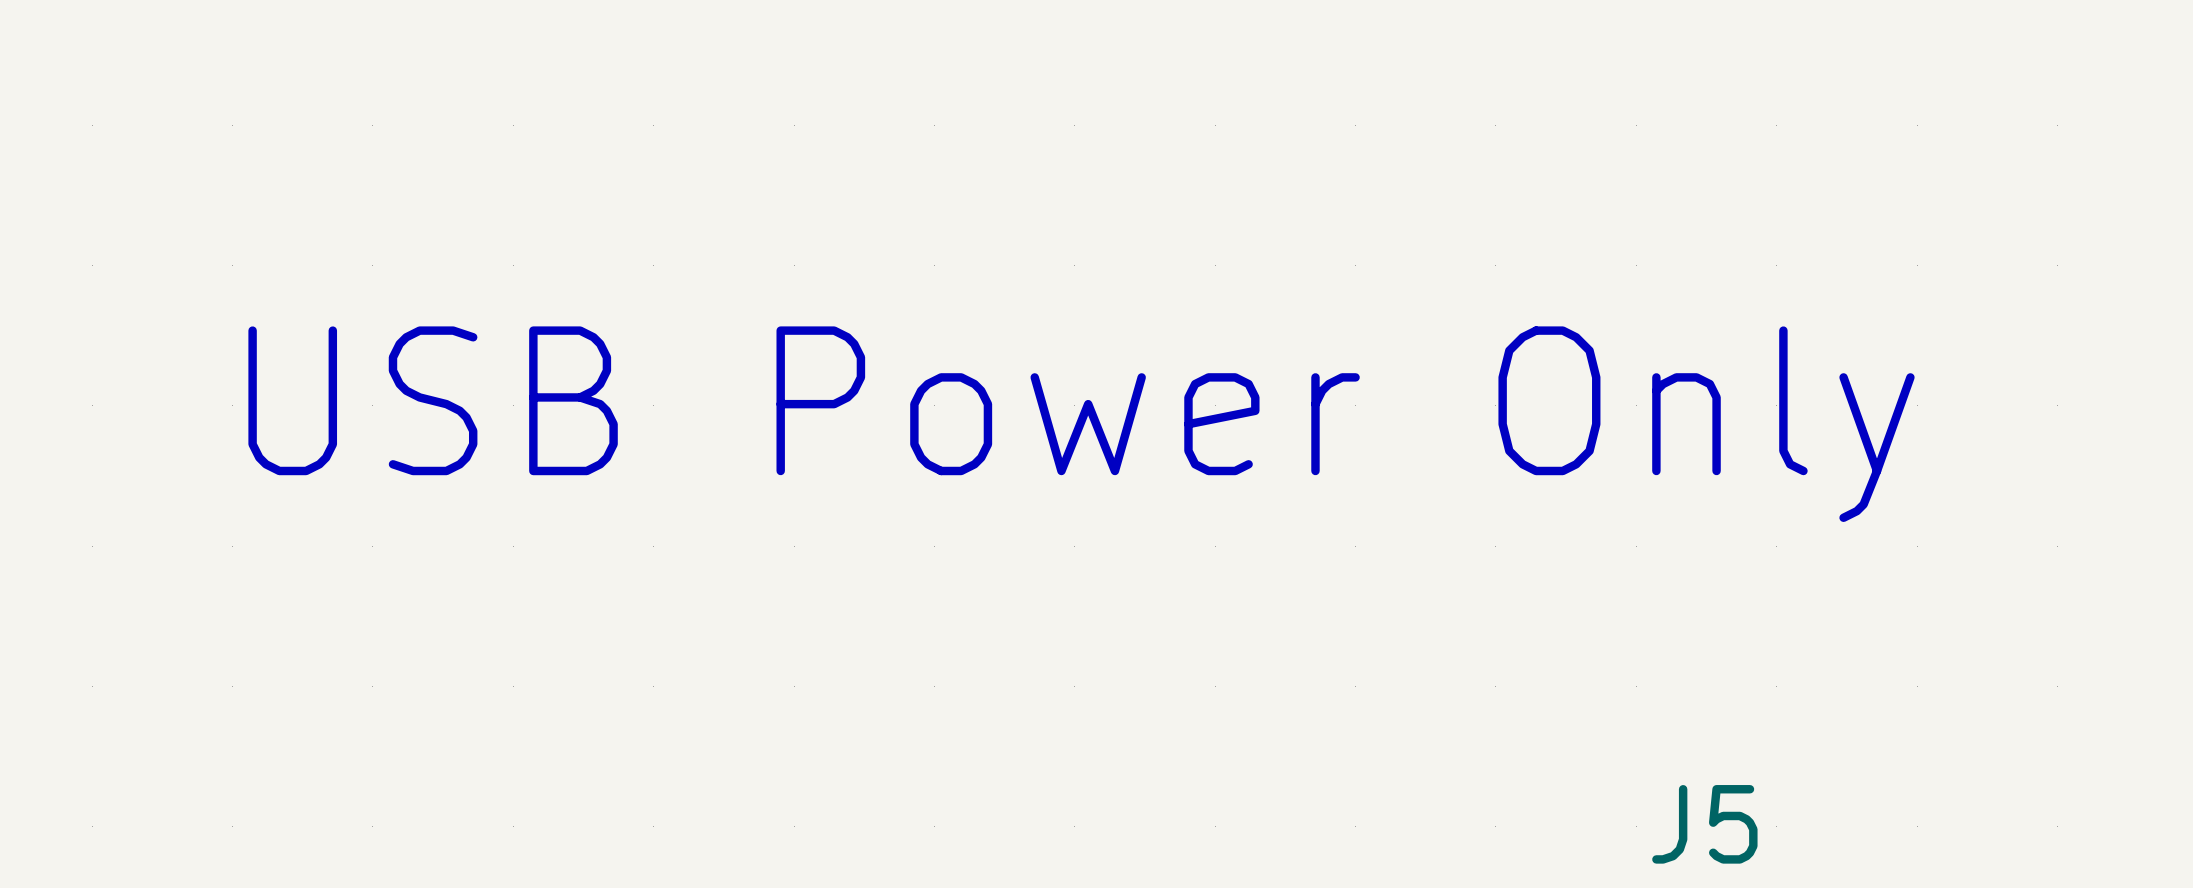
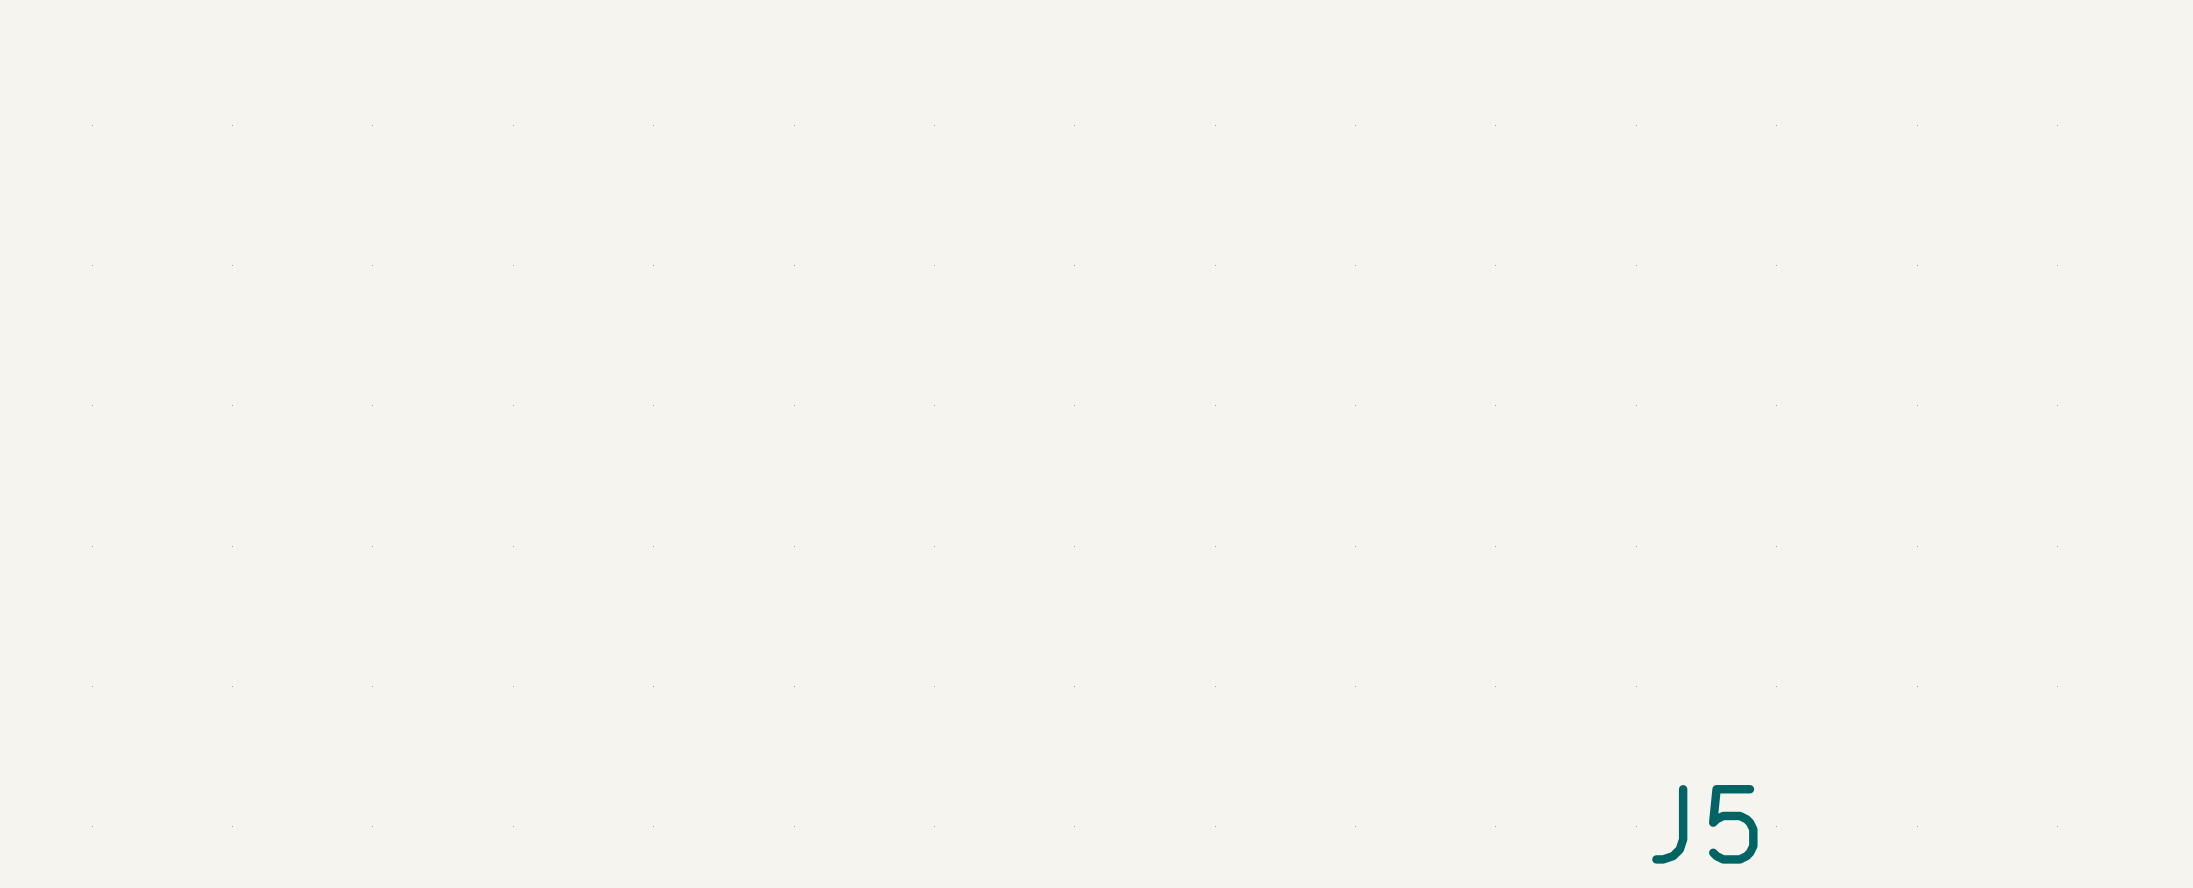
text: USB Power Only (1081, 424) -> none

